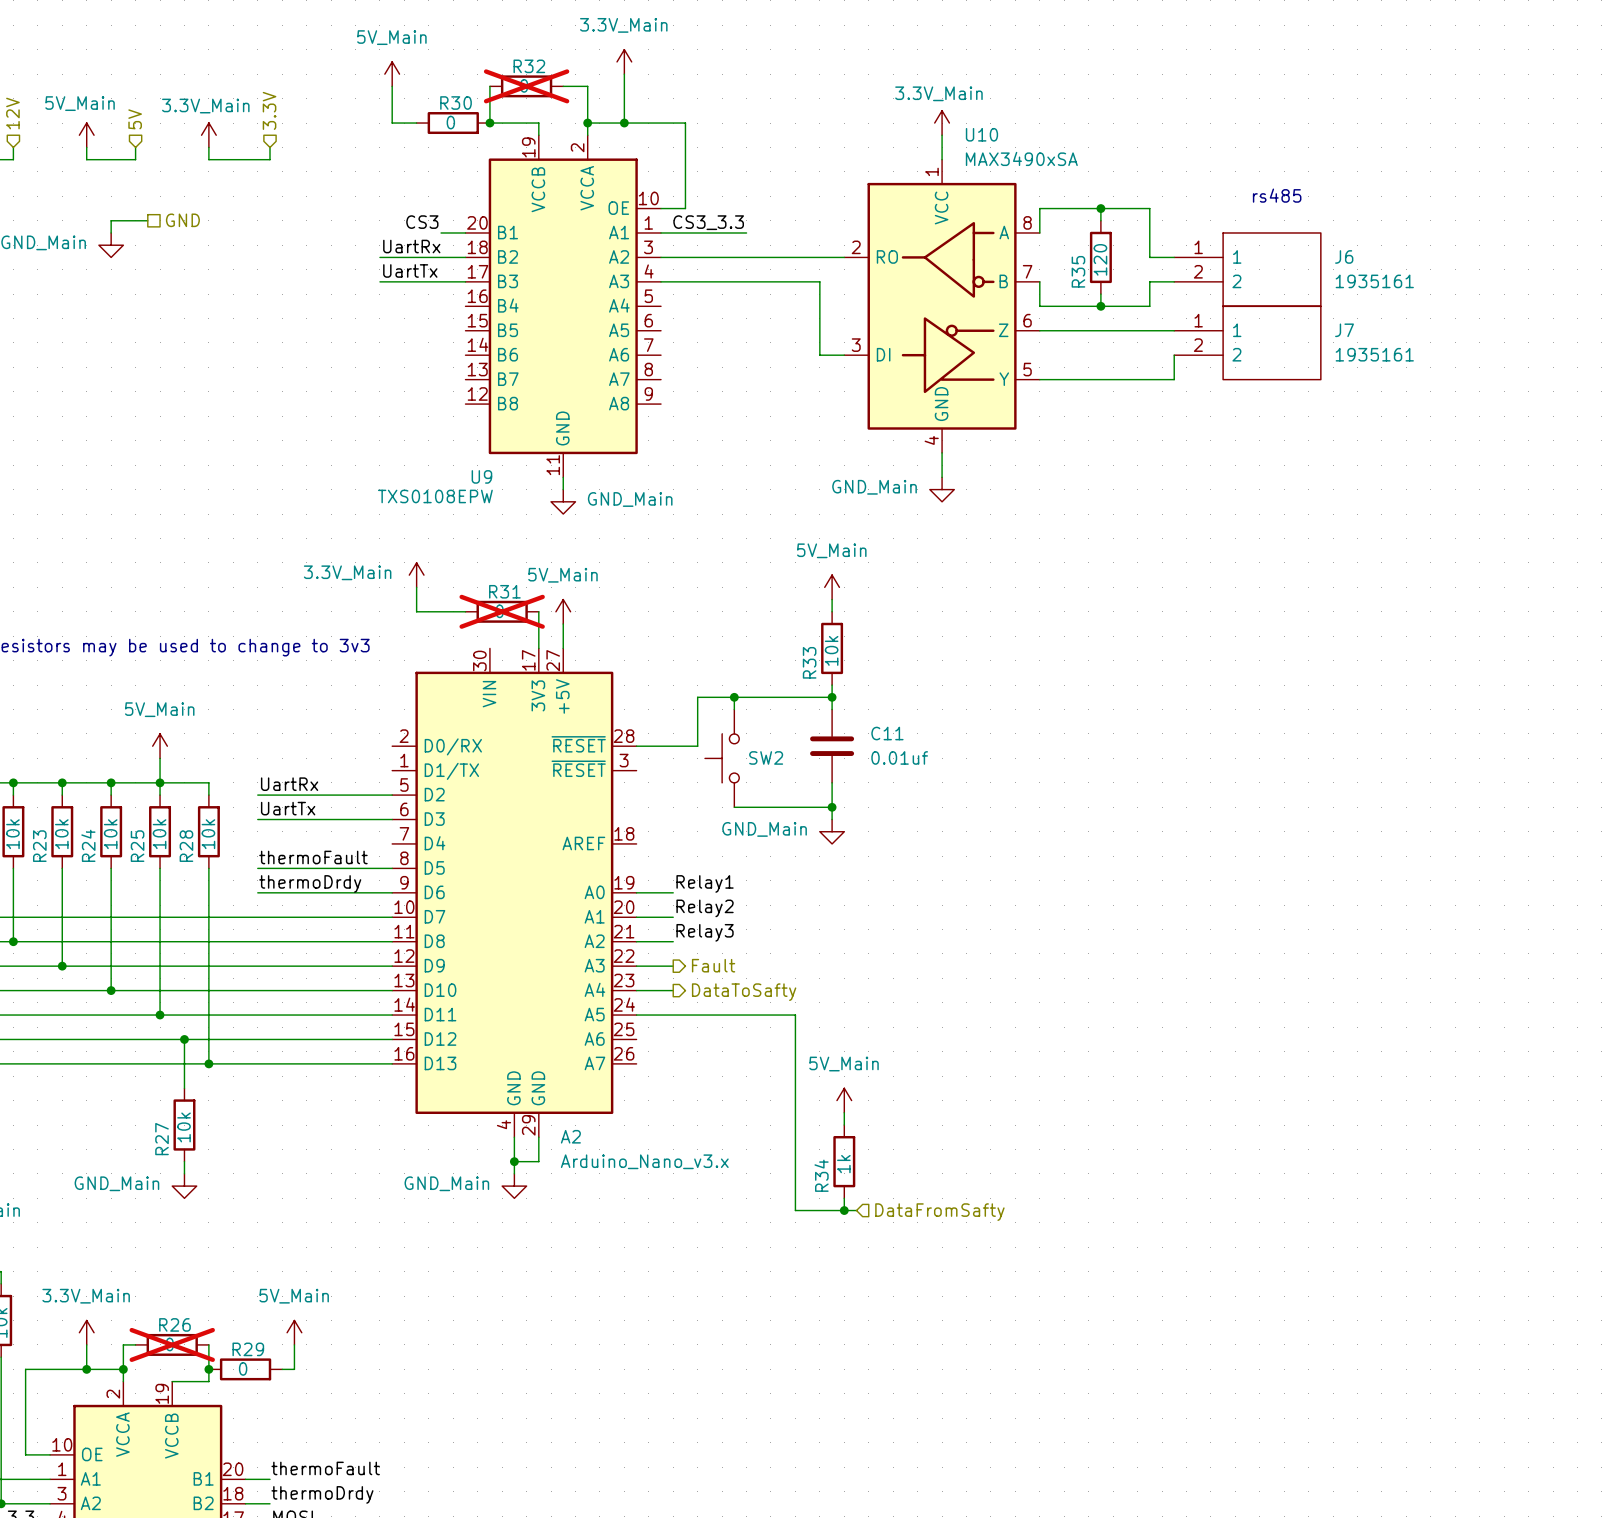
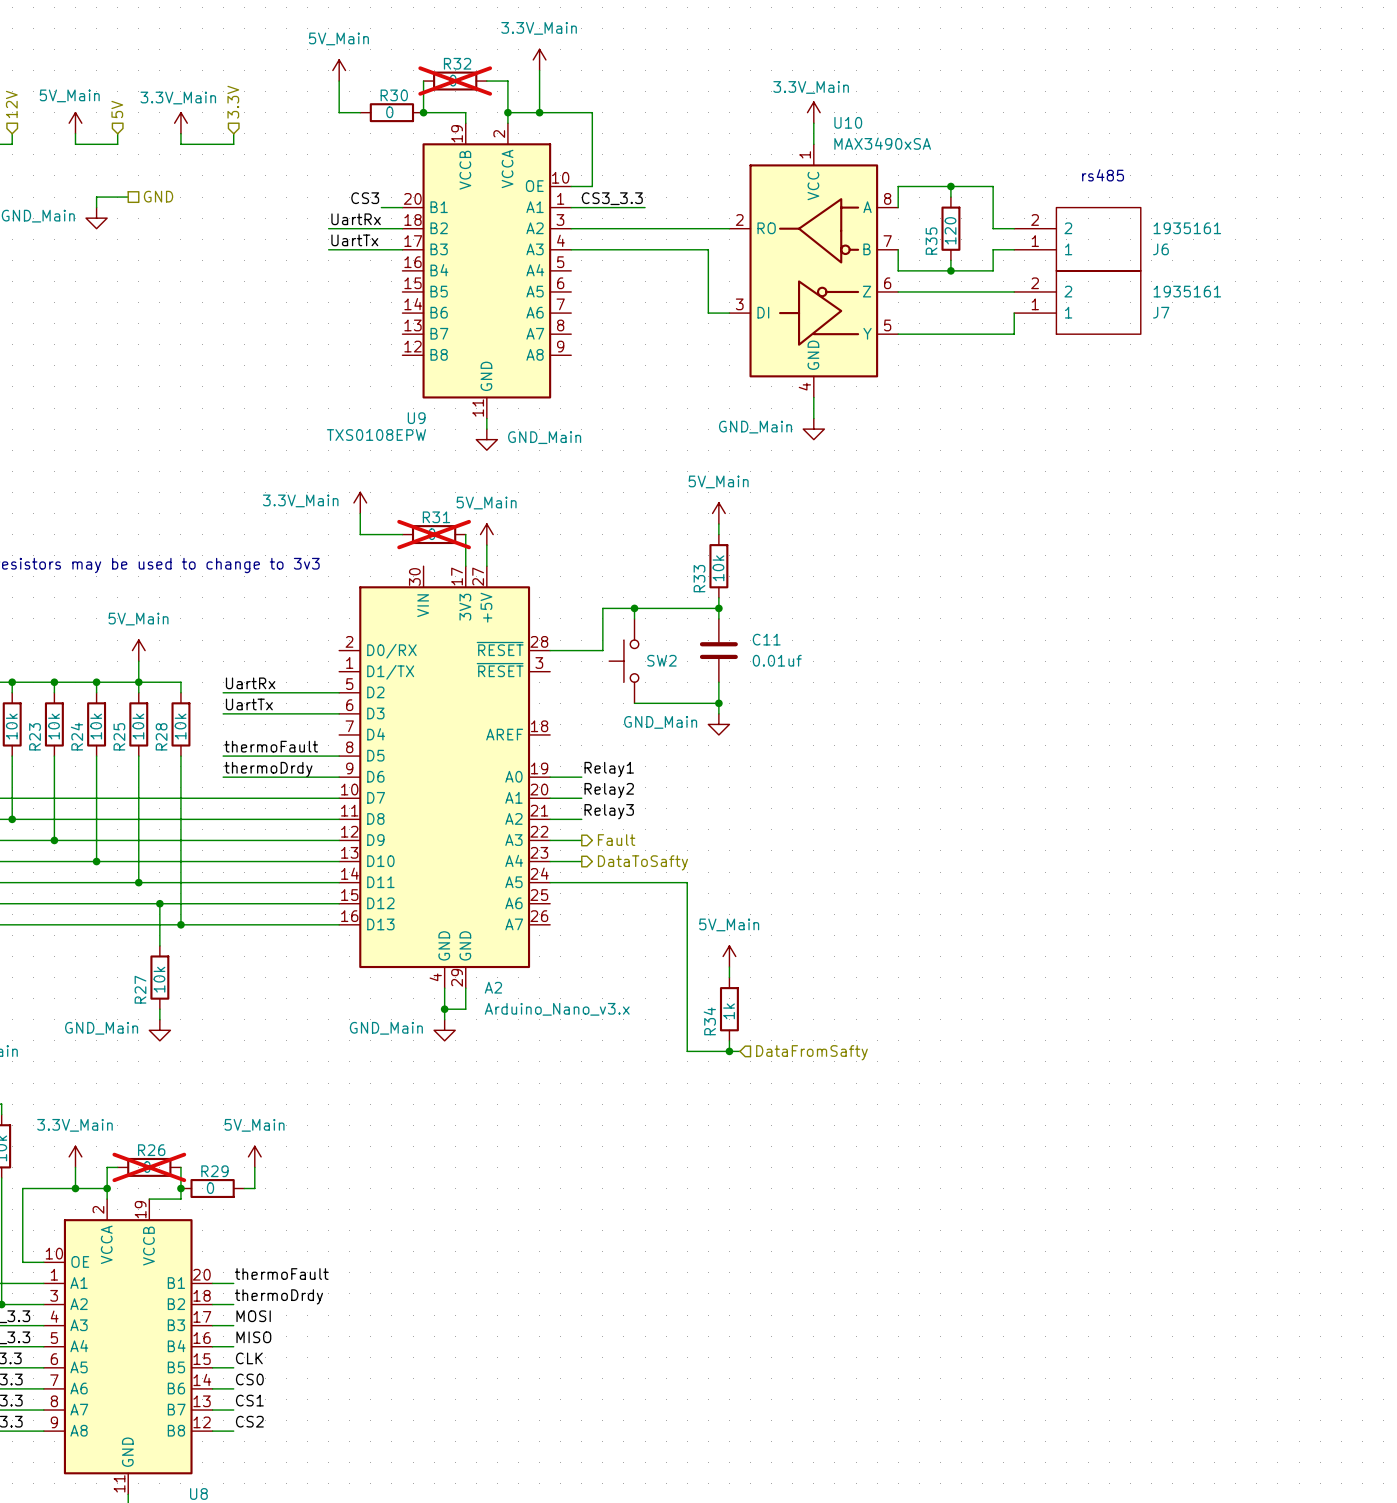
J6 flip: as is (1271, 269) -> up-down (1098, 239)
J7 flip: as is (1271, 342) -> up-down (1098, 302)

